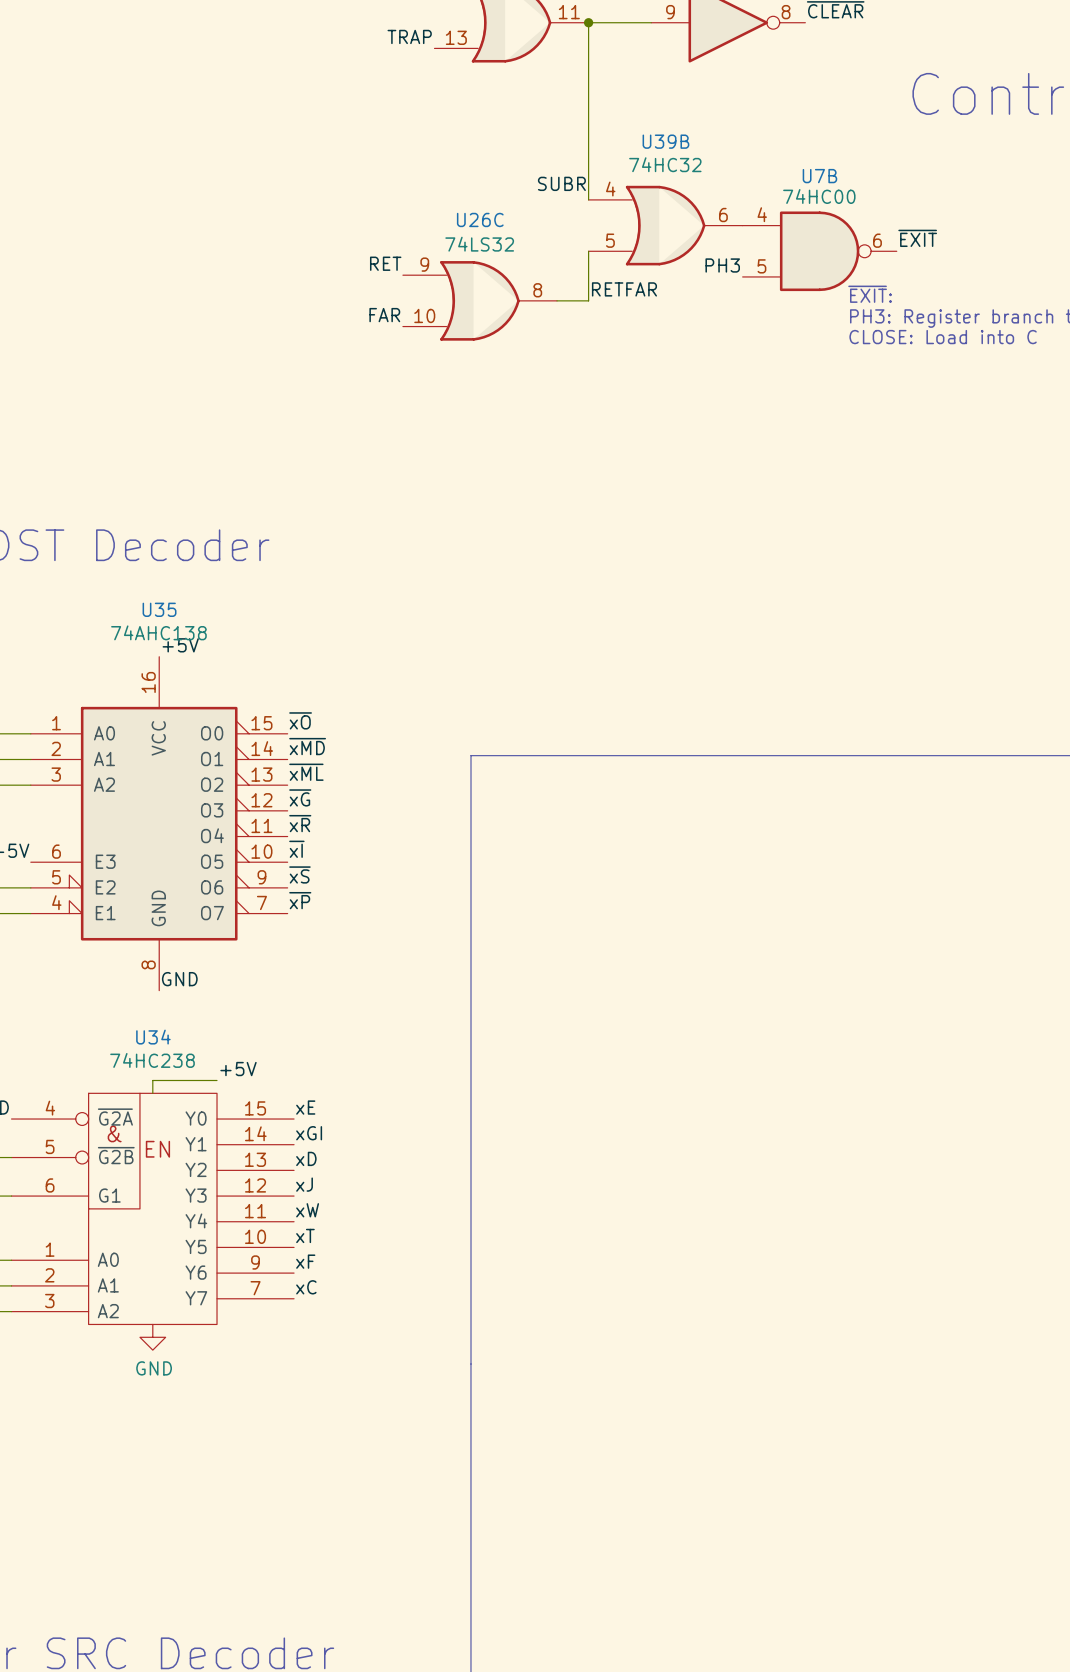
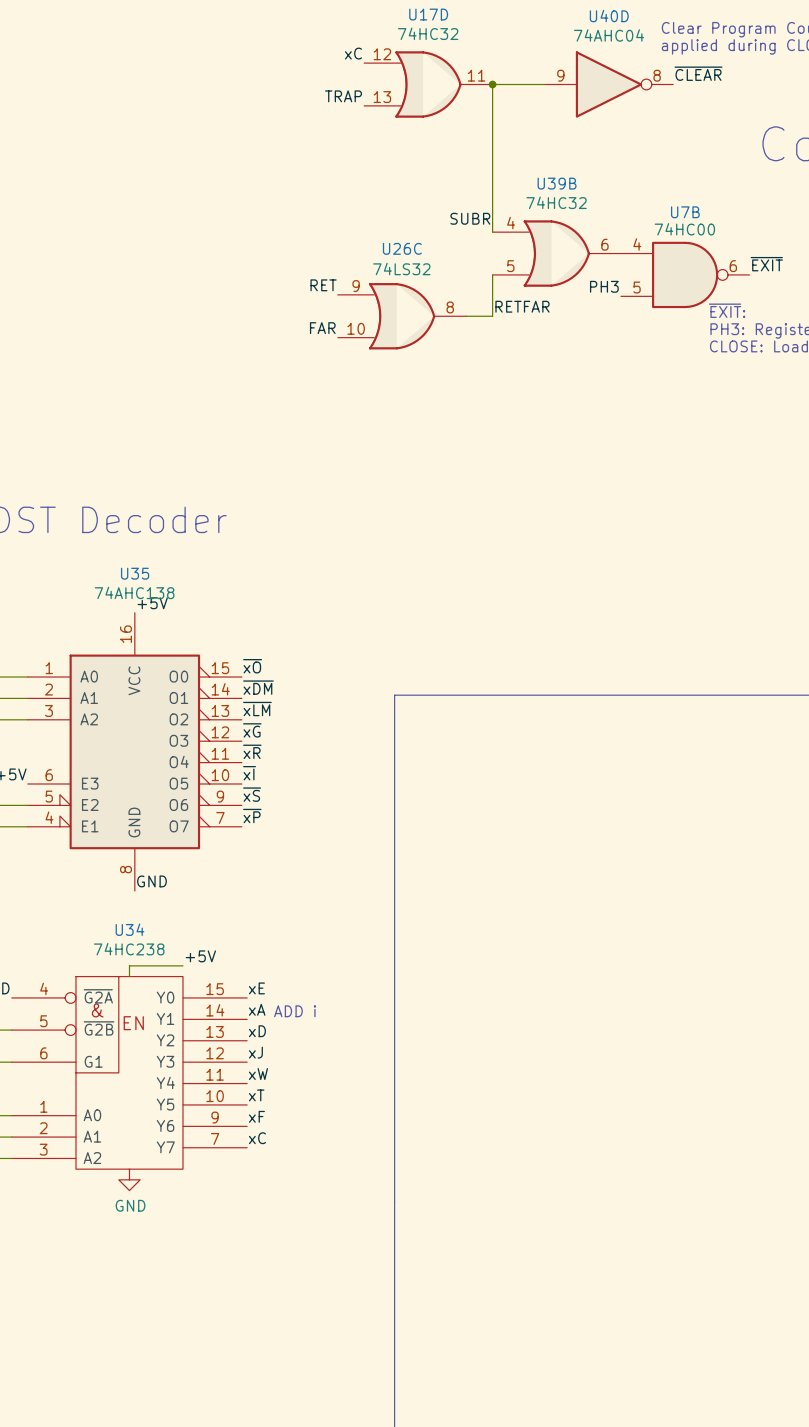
label: ~{xMD} (307, 746) -> ~{xDM} (258, 687)
label: ~{xML} (306, 772) -> ~{xLM} (257, 709)
label: xGI (309, 1133) -> xA (257, 1009)
text: none -> ADD i (295, 1011)

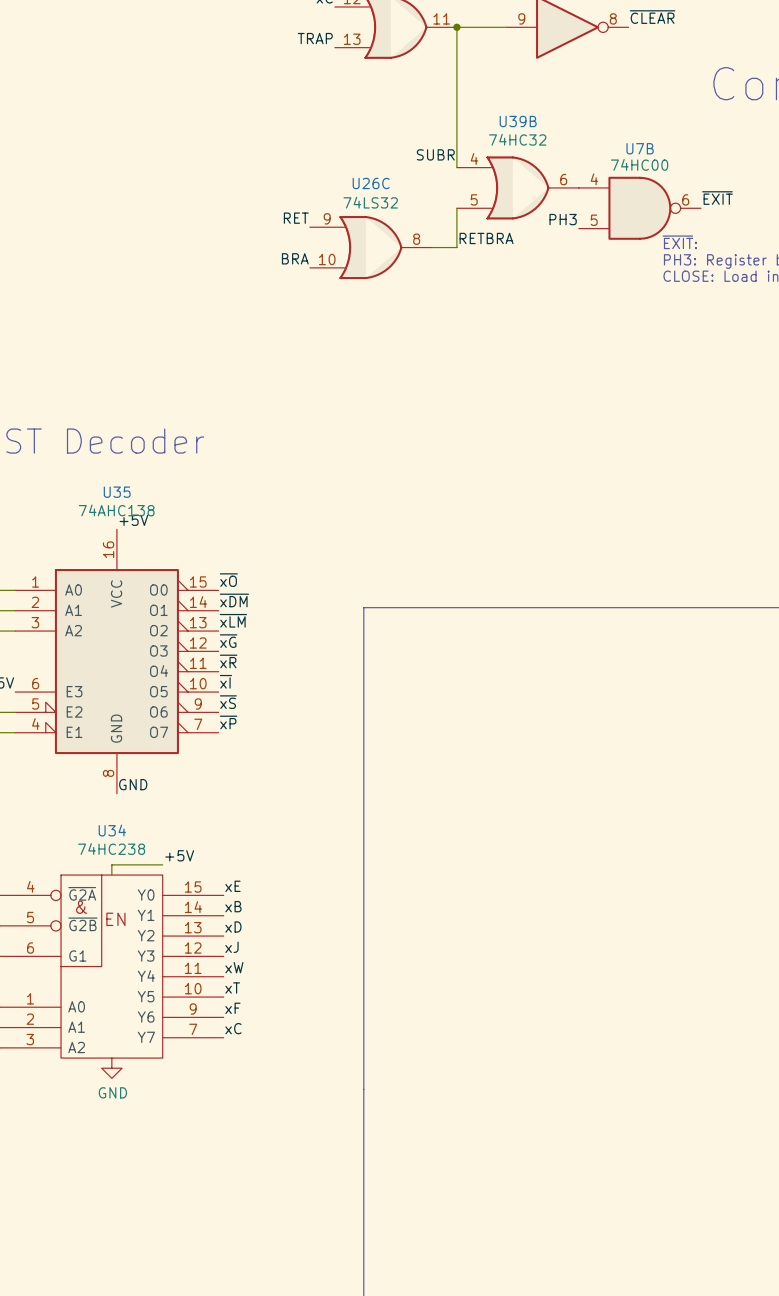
label: RETFAR (522, 306) -> RETBRA (486, 238)
label: FAR (322, 328) -> BRA (295, 258)
label: xA (257, 1009) -> xB (233, 906)
text: ADD i (295, 1011) -> none

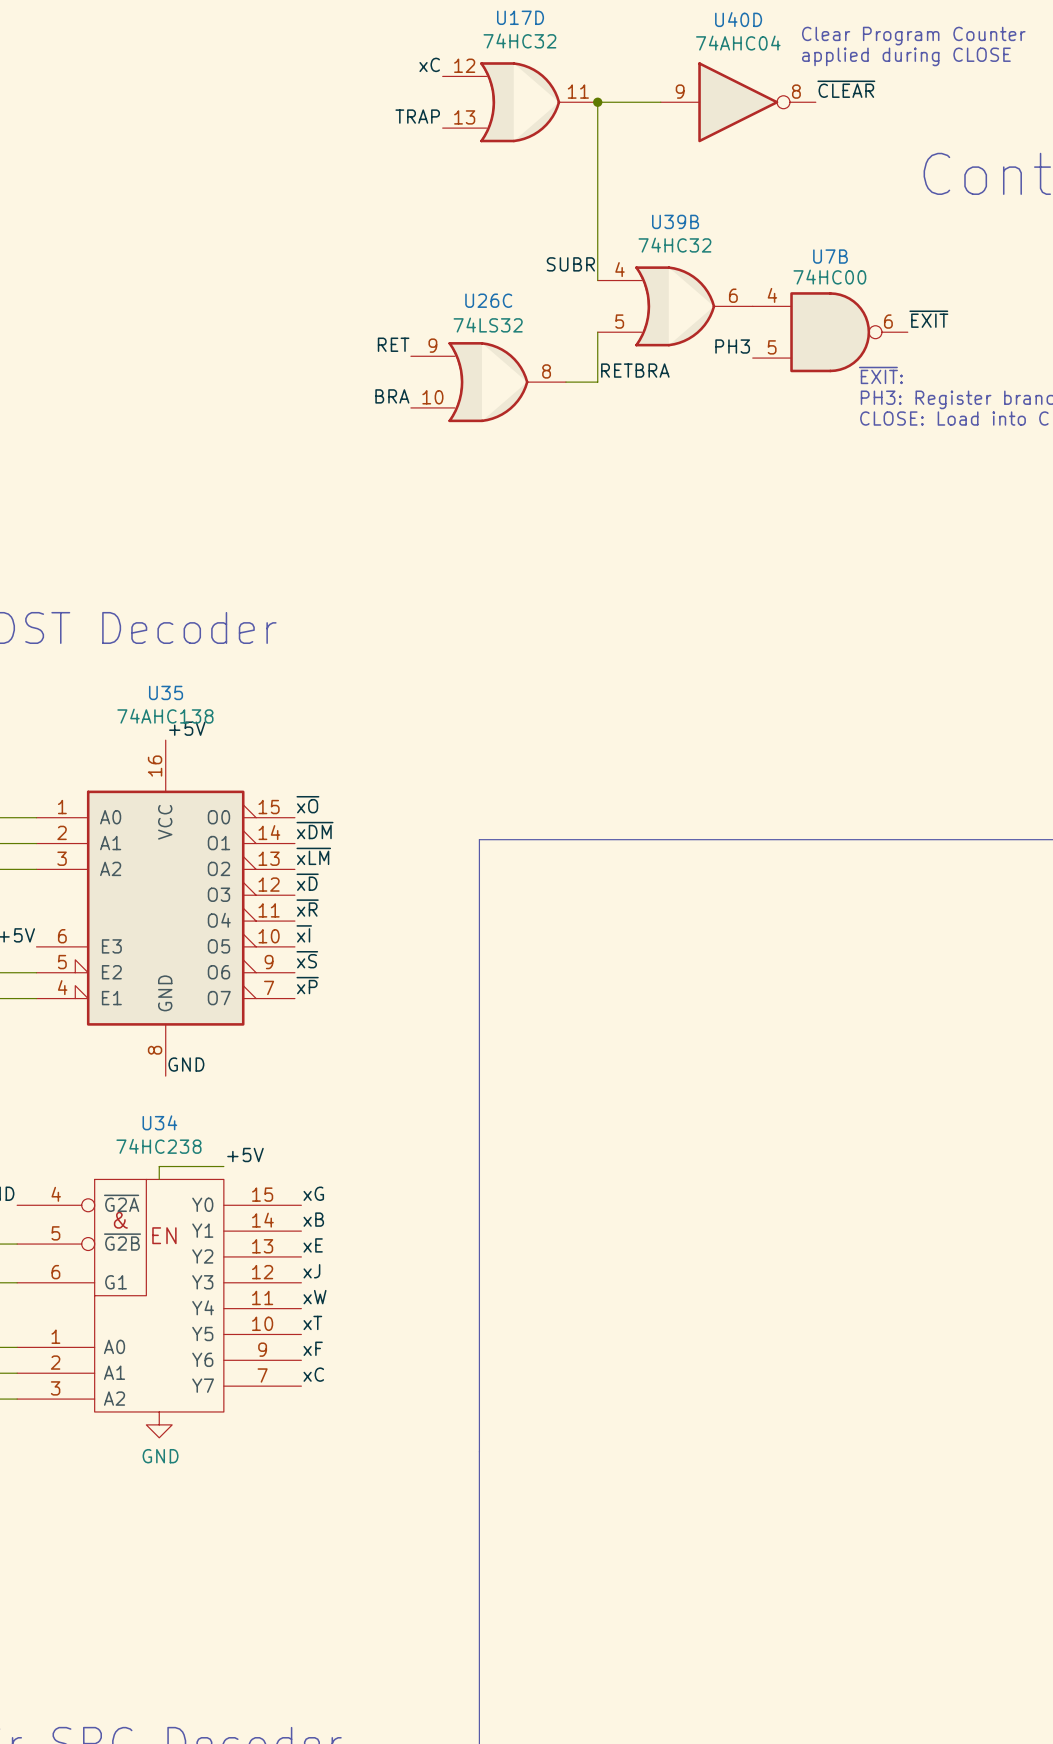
label: ~{xG} (228, 641) -> ~{xD} (307, 882)
label: xE (232, 886) -> xG (313, 1193)
label: xD (233, 926) -> xE (313, 1245)

